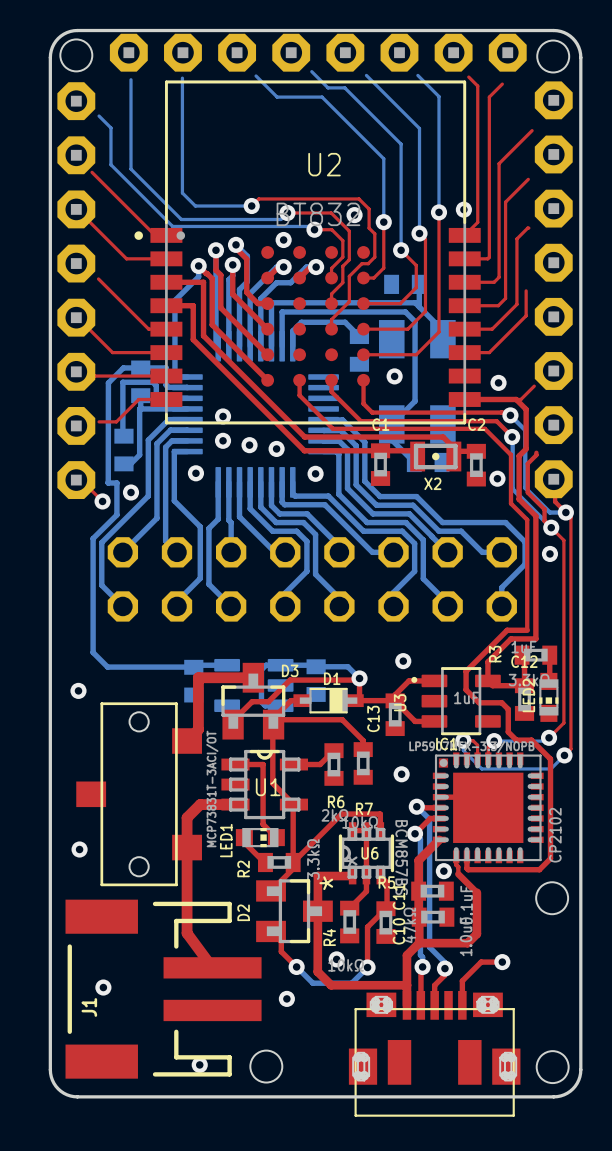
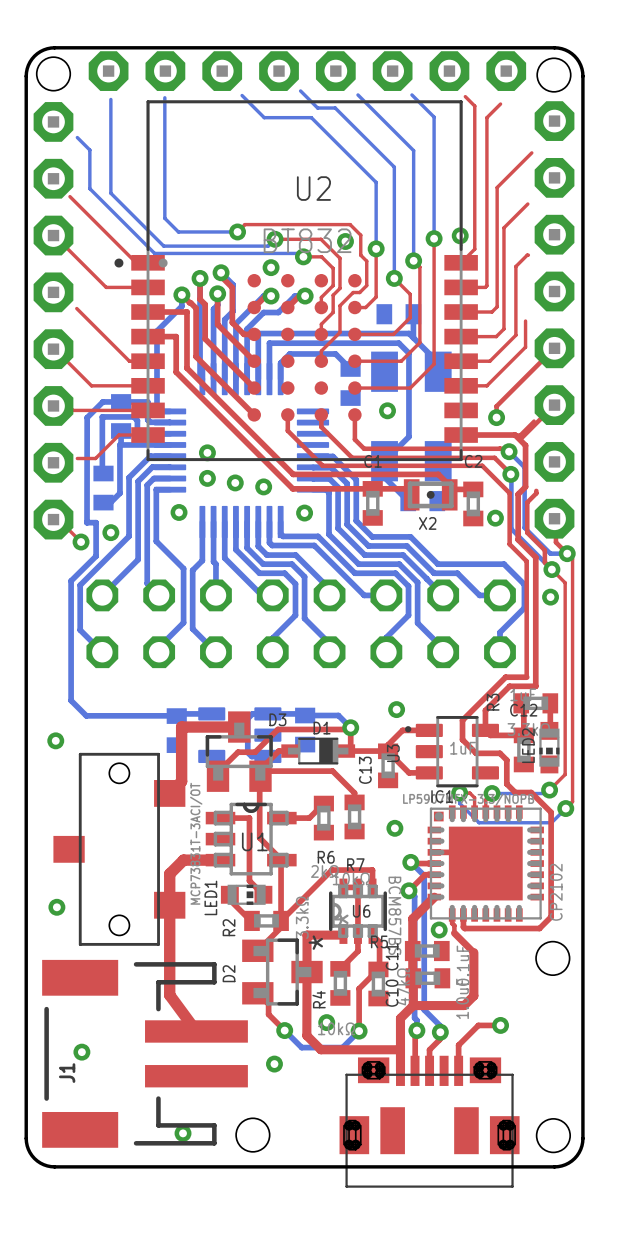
top track: none -> (554, 348) (496, 406) (496, 417)
top track: none -> (554, 405) (519, 439)

